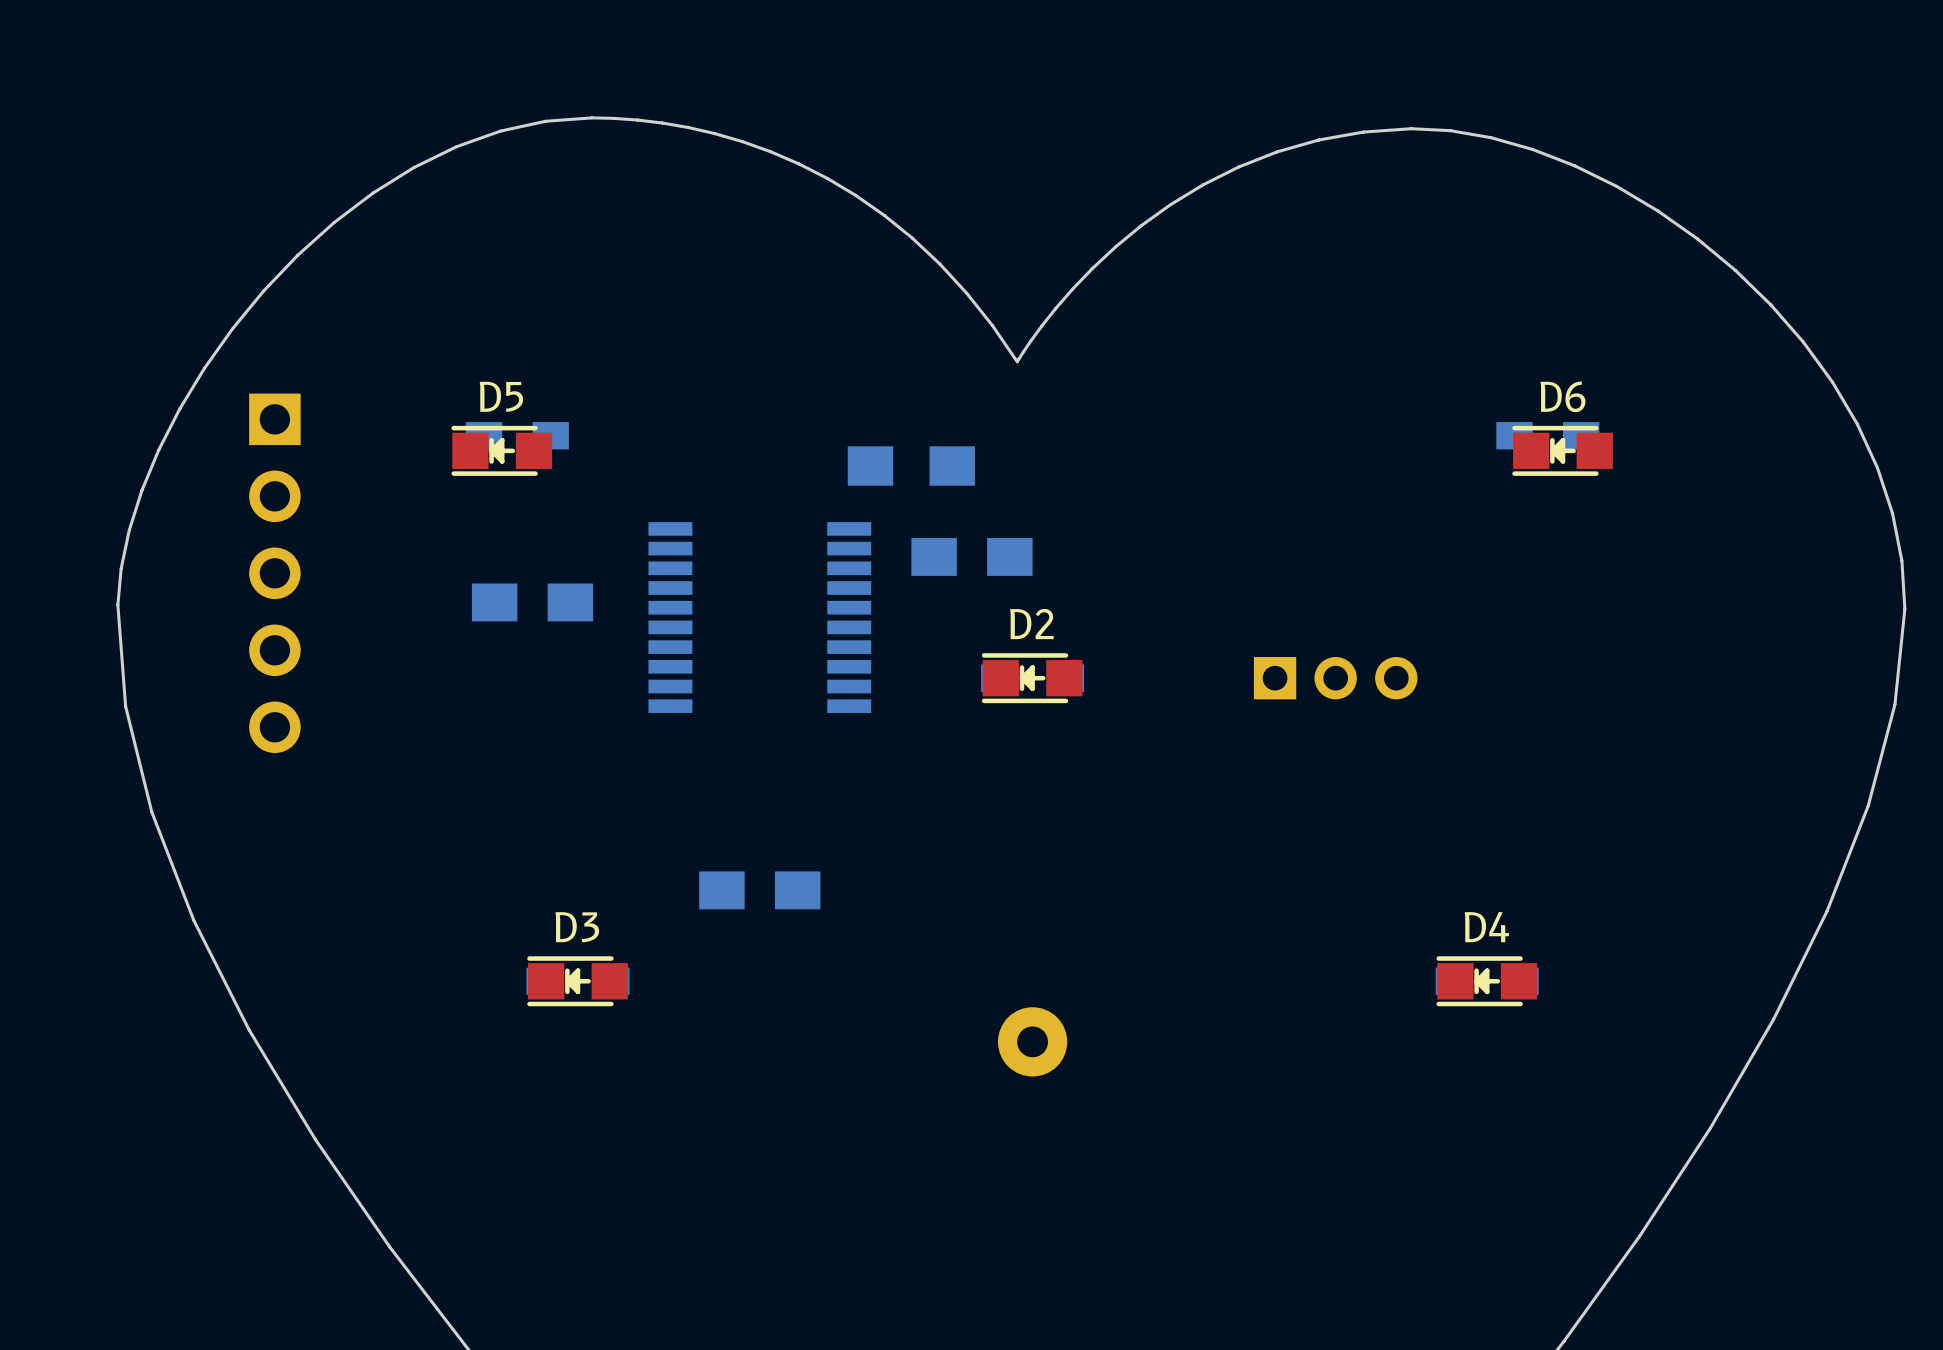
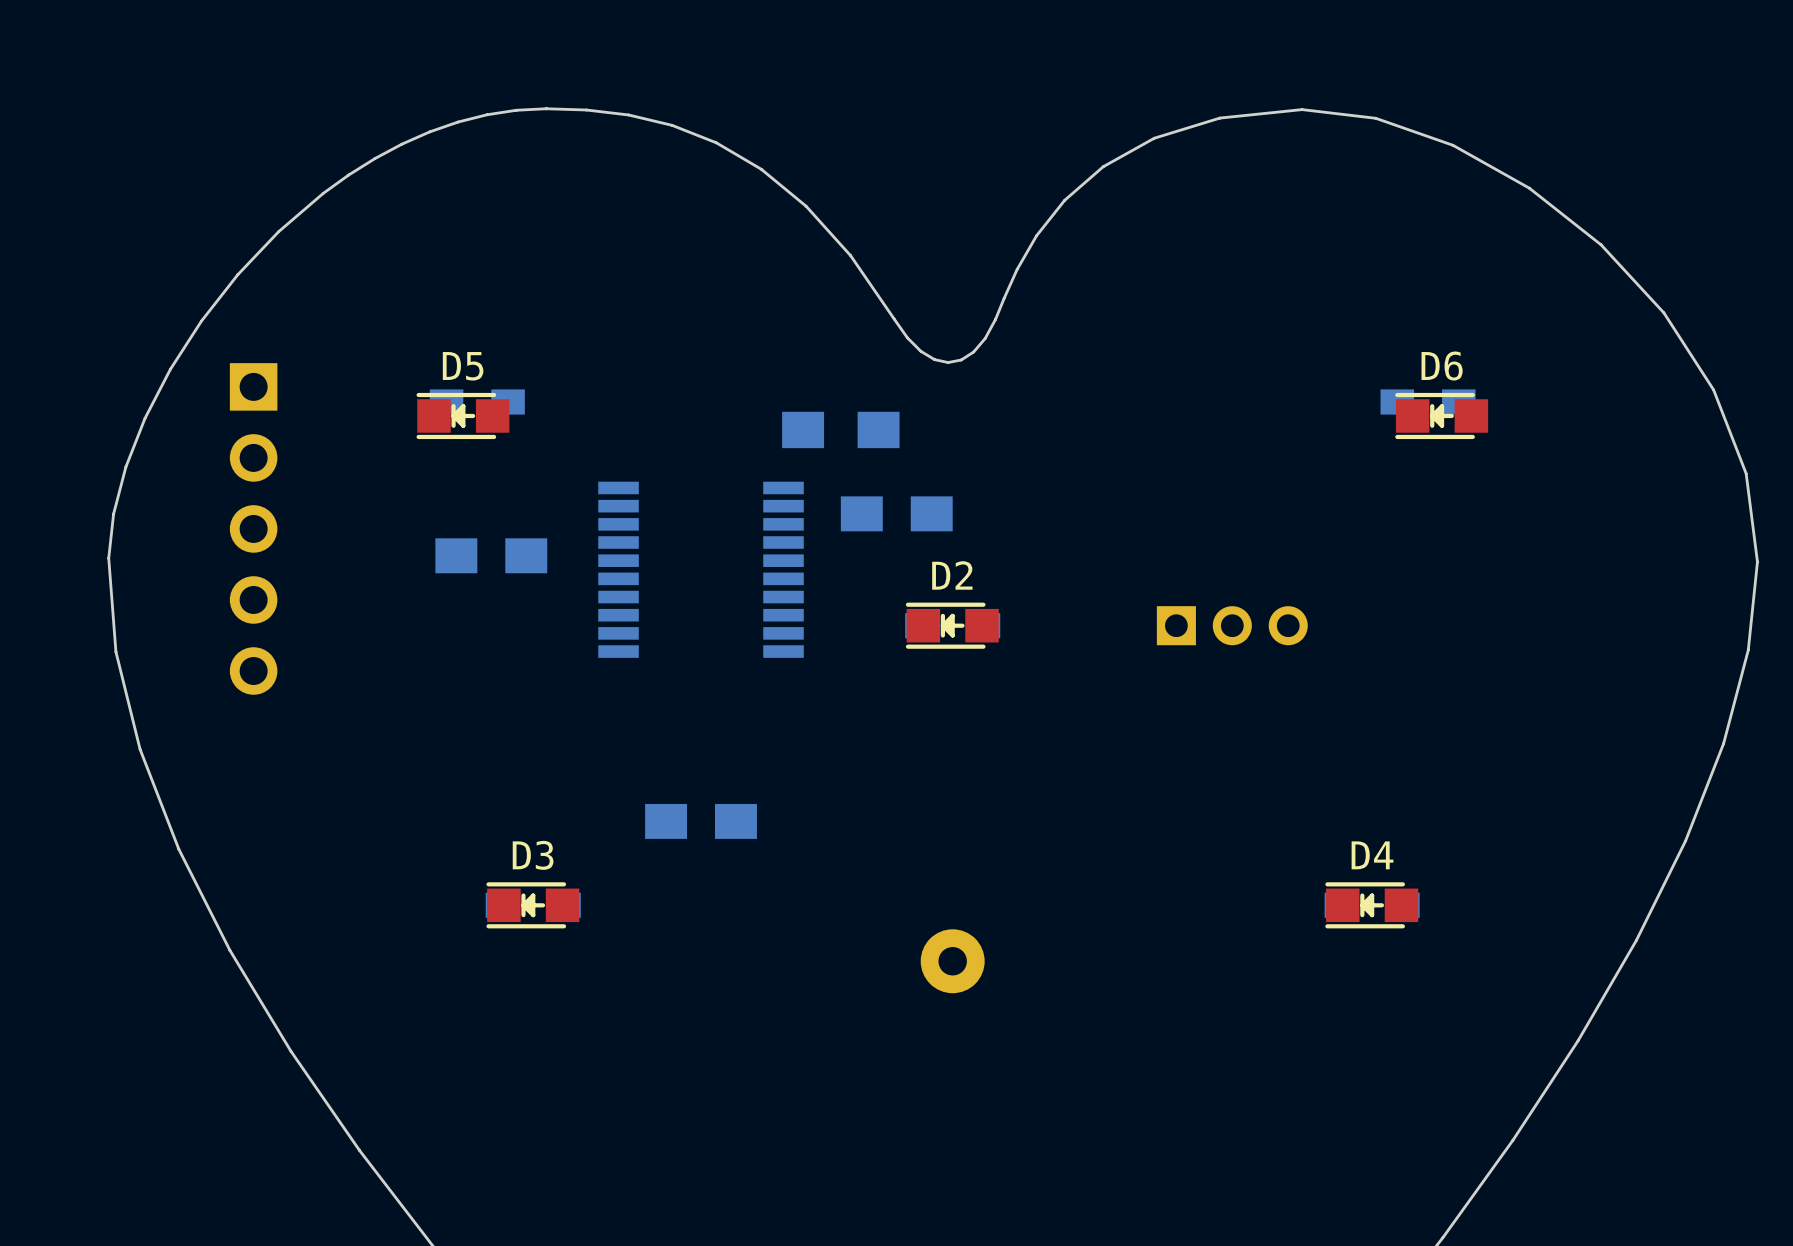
board edge: (117, 605) (121, 568) (129, 530) (141, 490) (158, 449) (179, 408) (204, 368) (232, 328) (263, 291) (297, 255) (334, 222) (373, 193) (414, 167) (456, 146) (500, 131) (545, 121) (591, 117) (662, 123) (715, 133) (770, 151) (827, 178) (884, 215) (939, 264) (992, 325) (1017, 361) (1055, 308) (1092, 268) (1115, 246) (1170, 204) (1203, 184) (1238, 167) (1277, 151) (1318, 140) (1363, 132) (1411, 128) (1450, 130) (1491, 137) (1532, 149) (1574, 165) (1616, 186) (1657, 210) (1697, 238) (1735, 270) (1770, 304) (1803, 342) (1832, 382) (1857, 424) (1877, 468) (1892, 513) (1901, 560) (1904, 609) -> (108, 558) (113, 514) (125, 467) (145, 418) (170, 369) (201, 320) (237, 274) (278, 231) (323, 193) (374, 158) (429, 131) (487, 114) (516, 110) (586, 110) (628, 114) (672, 125) (716, 142) (761, 169) (806, 206) (850, 255) (907, 337) (921, 351) (934, 359) (948, 362) (961, 359) (973, 352) (985, 338) (1017, 269) (1036, 235) (1064, 200) (1103, 166) (1154, 138) (1219, 118) (1302, 109) (1375, 118) (1452, 145) (1529, 188) (1601, 244) (1663, 312) (1713, 389) (1746, 473) (1757, 561)

